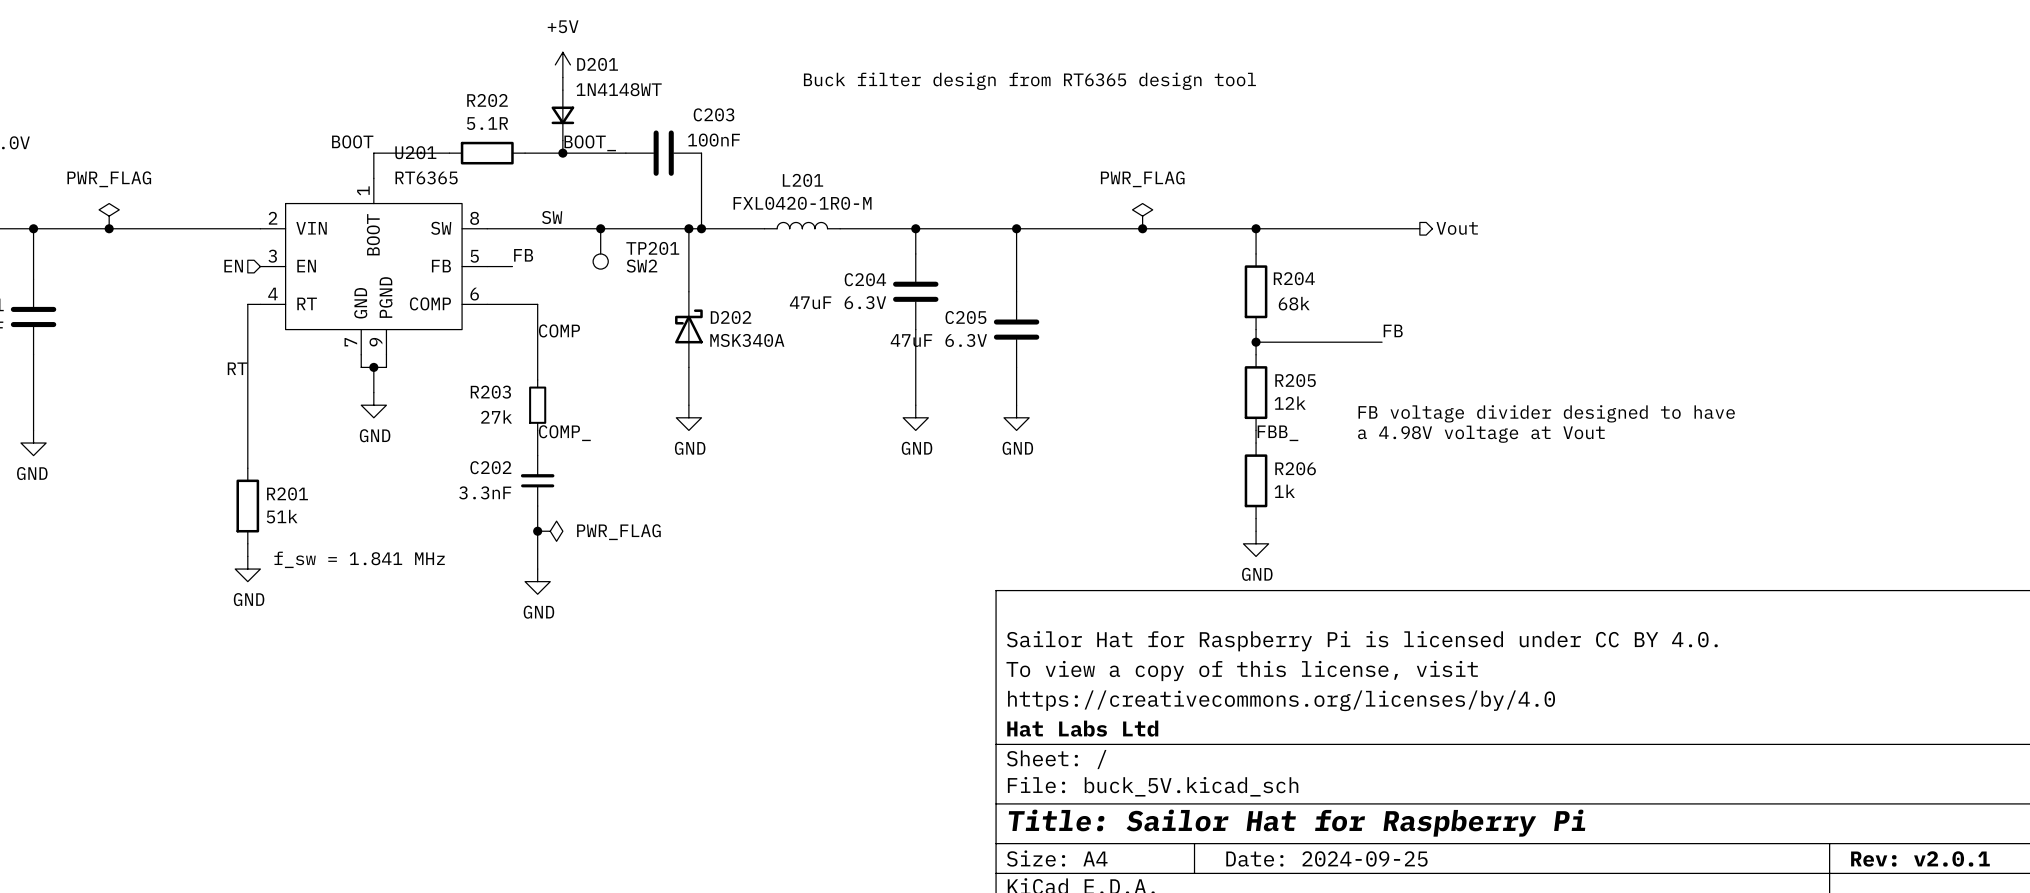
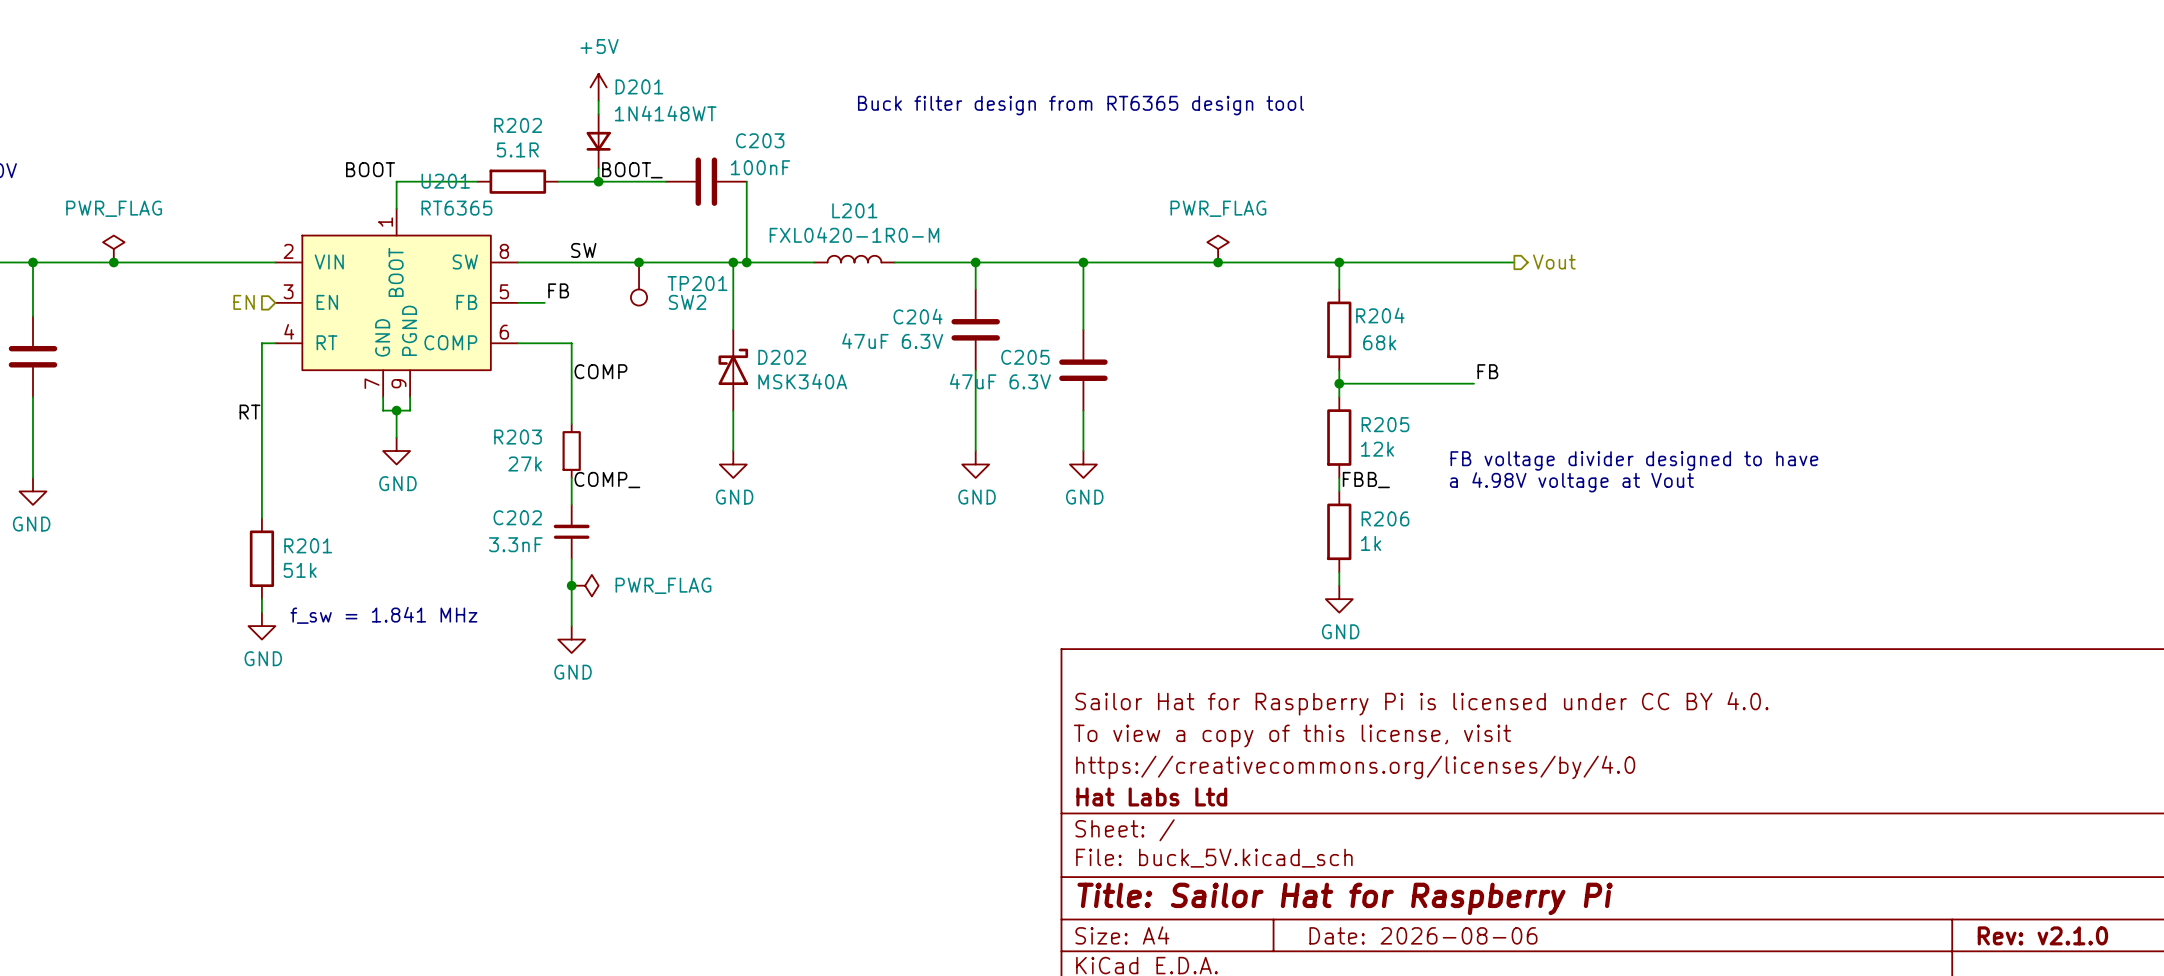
title block: Date: 2024-09-25 (1326, 858) -> Date: 2026-08-06 (1423, 935)
title block: Rev: v2.0.1 (1920, 858) -> Rev: v2.1.0 (2042, 935)

